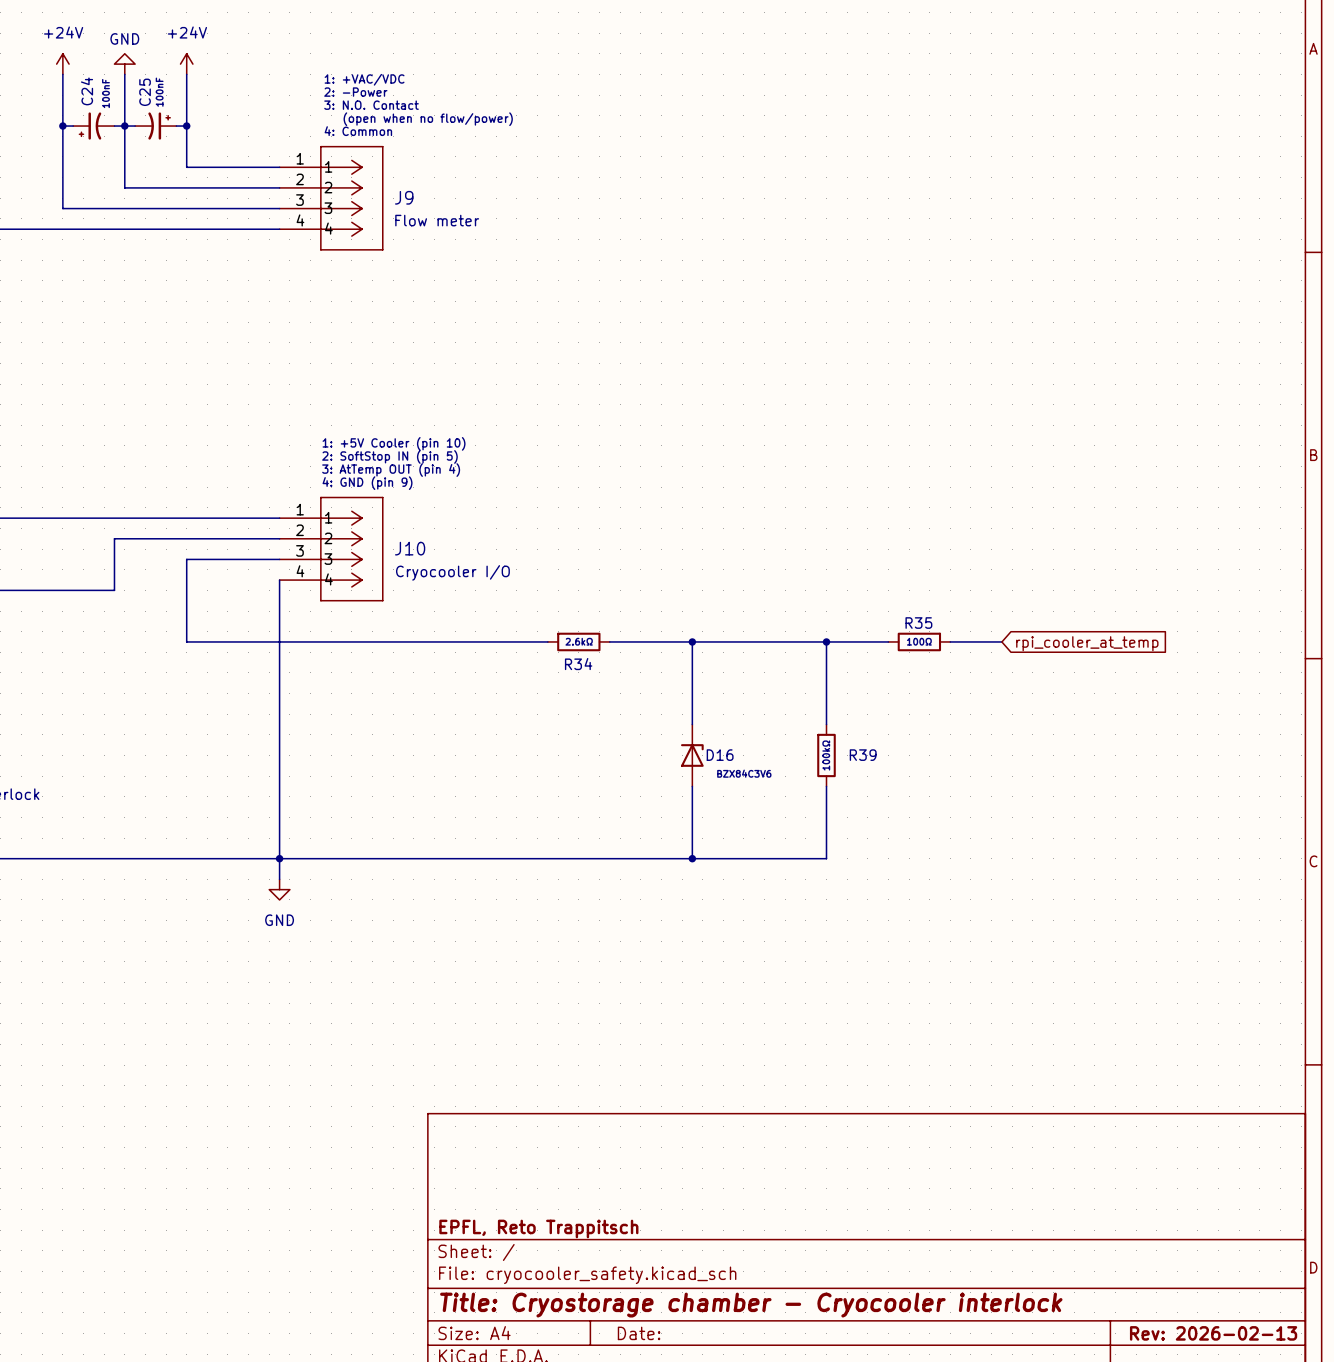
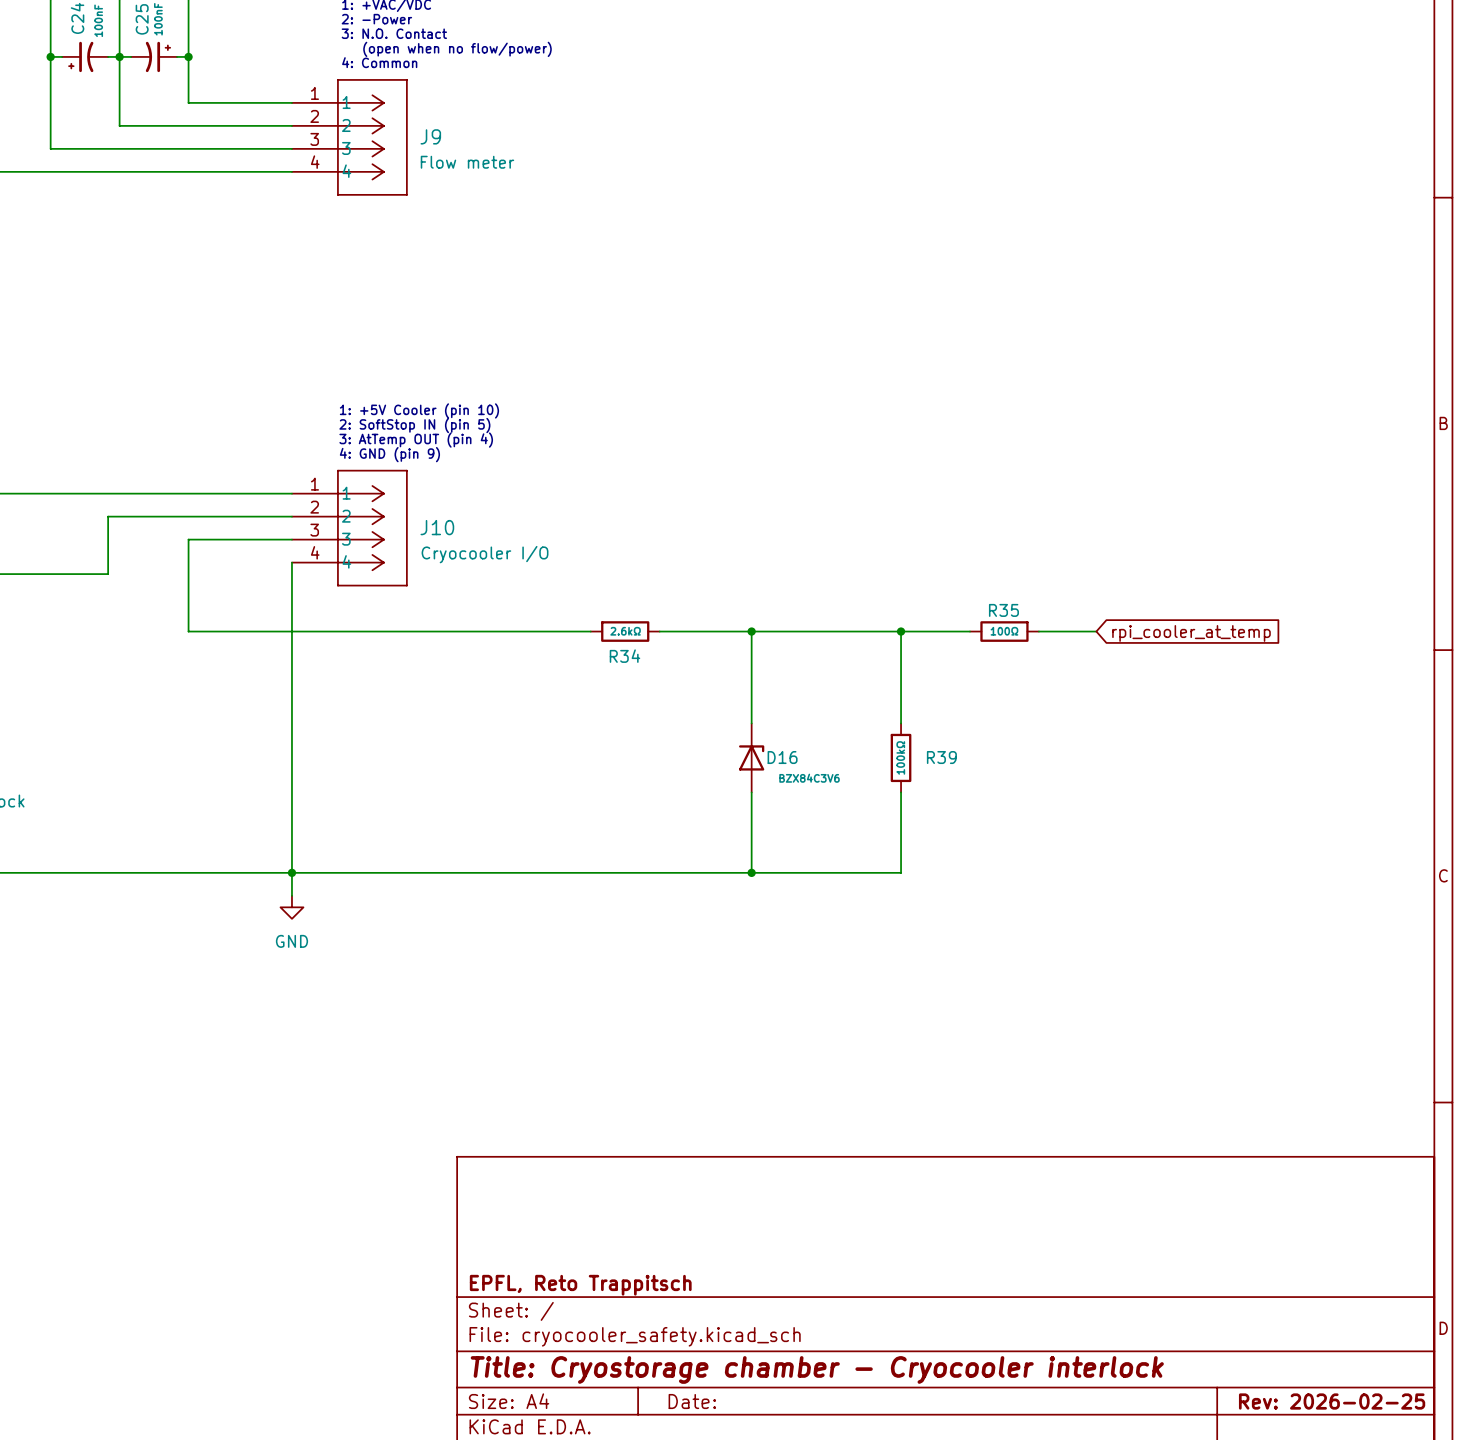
title block: Rev: 2026-02-13 (1213, 1333) -> Rev: 2026-02-25 (1332, 1401)

